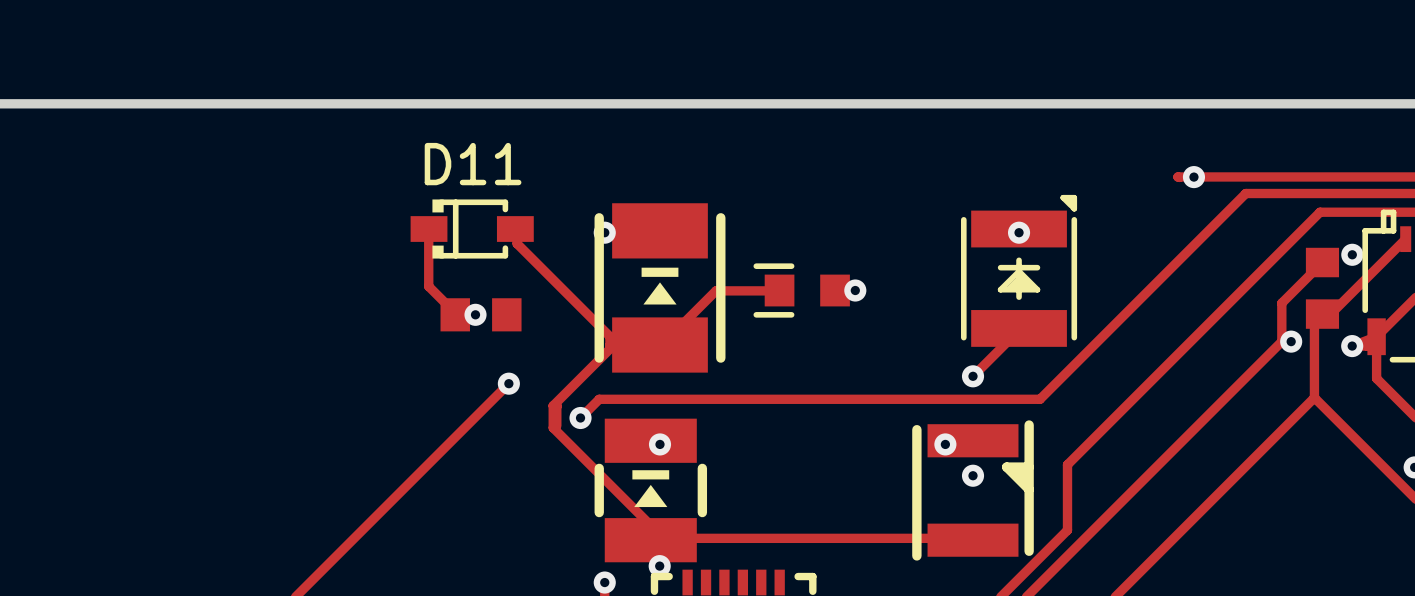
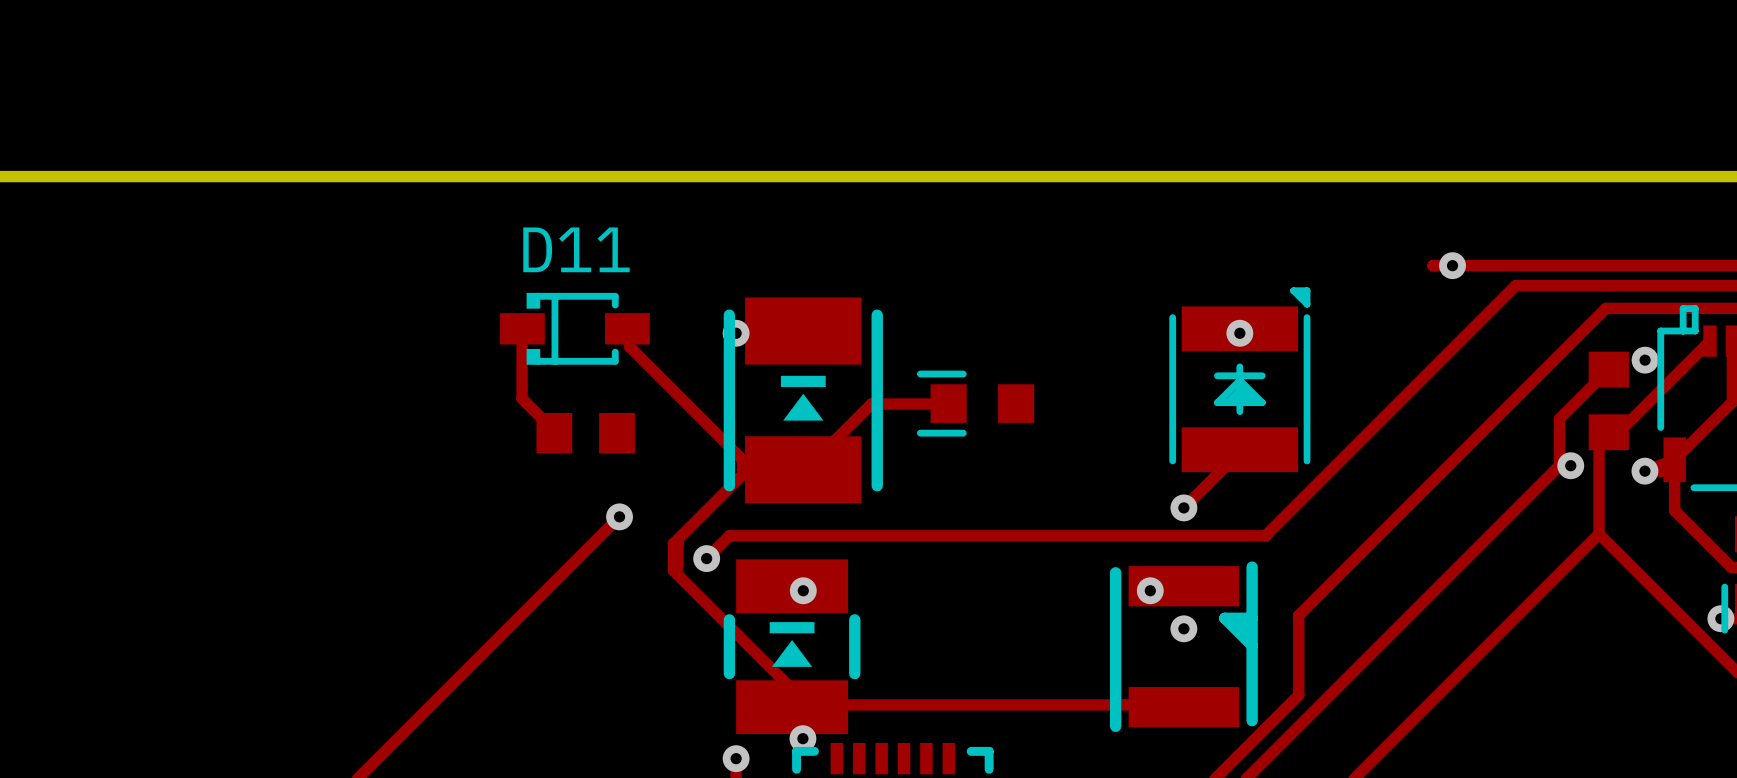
via: (855, 290) -> none
via: (475, 314) -> none

